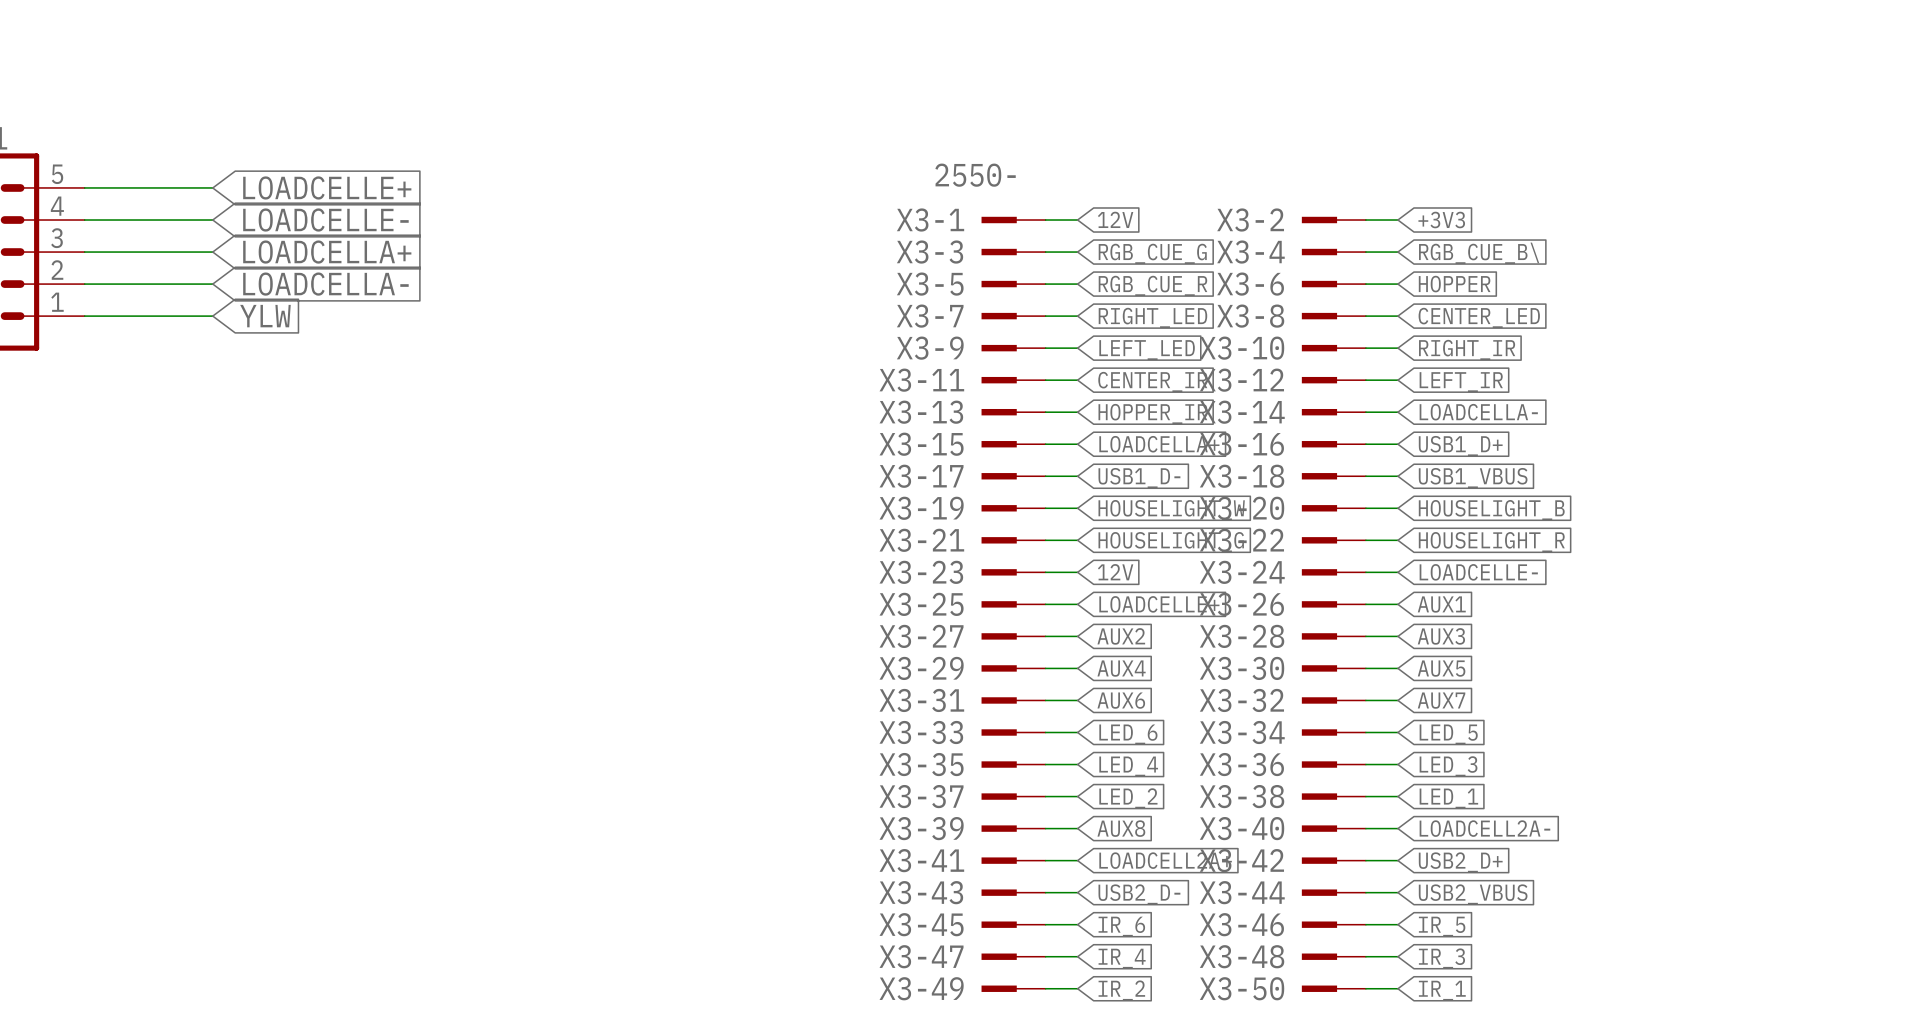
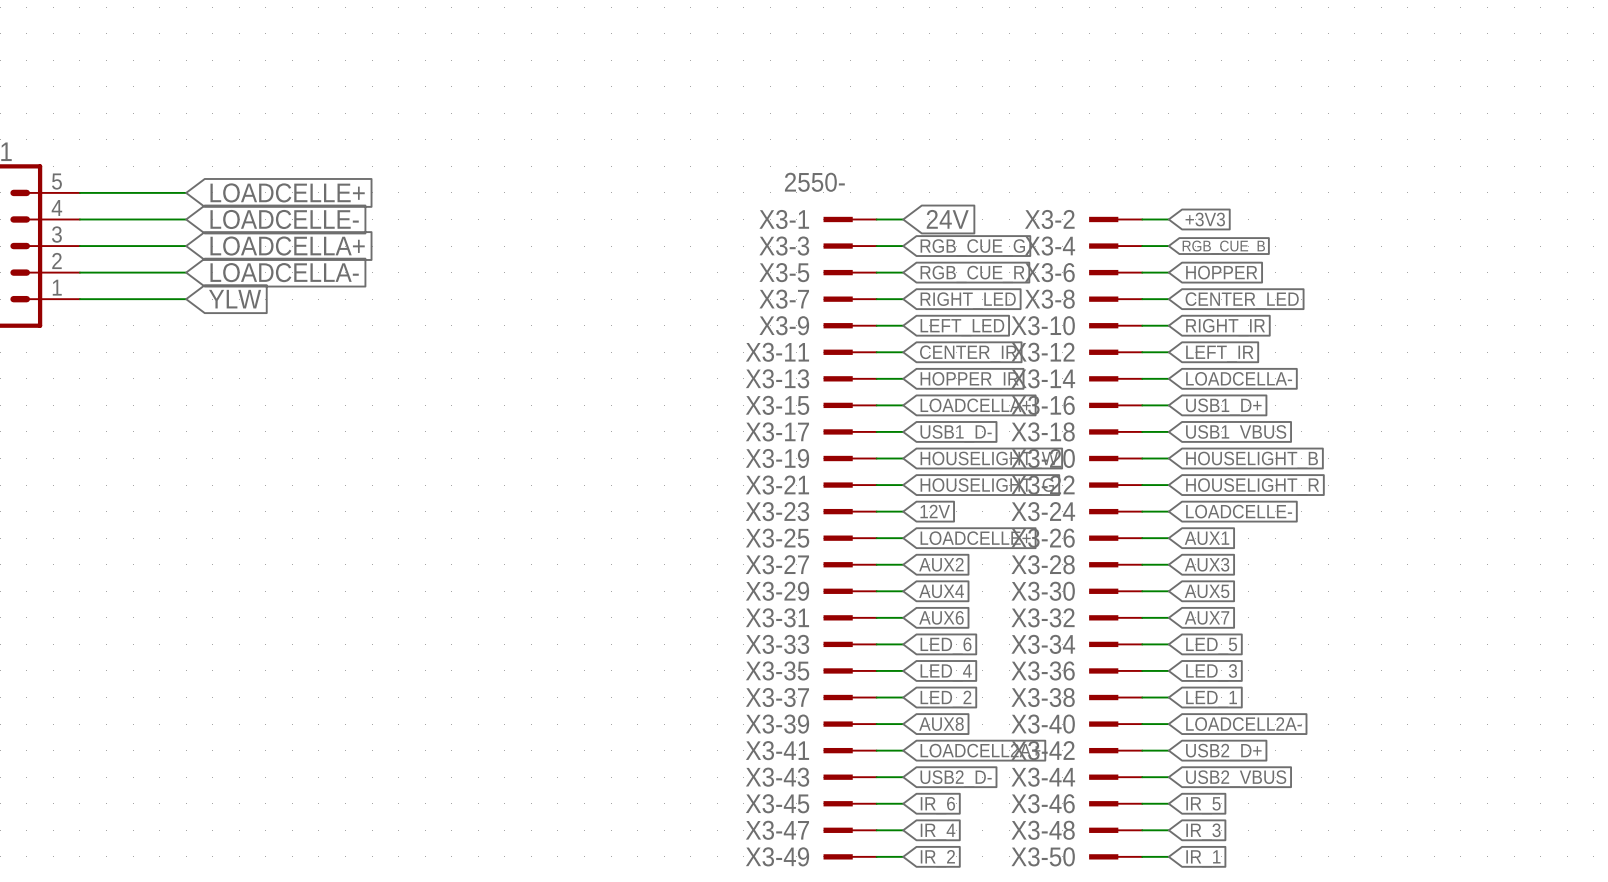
global label: 12V (1115, 219) -> 24V (947, 219)
global label: RGB_CUE_B\ (1479, 253) -> RGB_CUE_B (1223, 247)

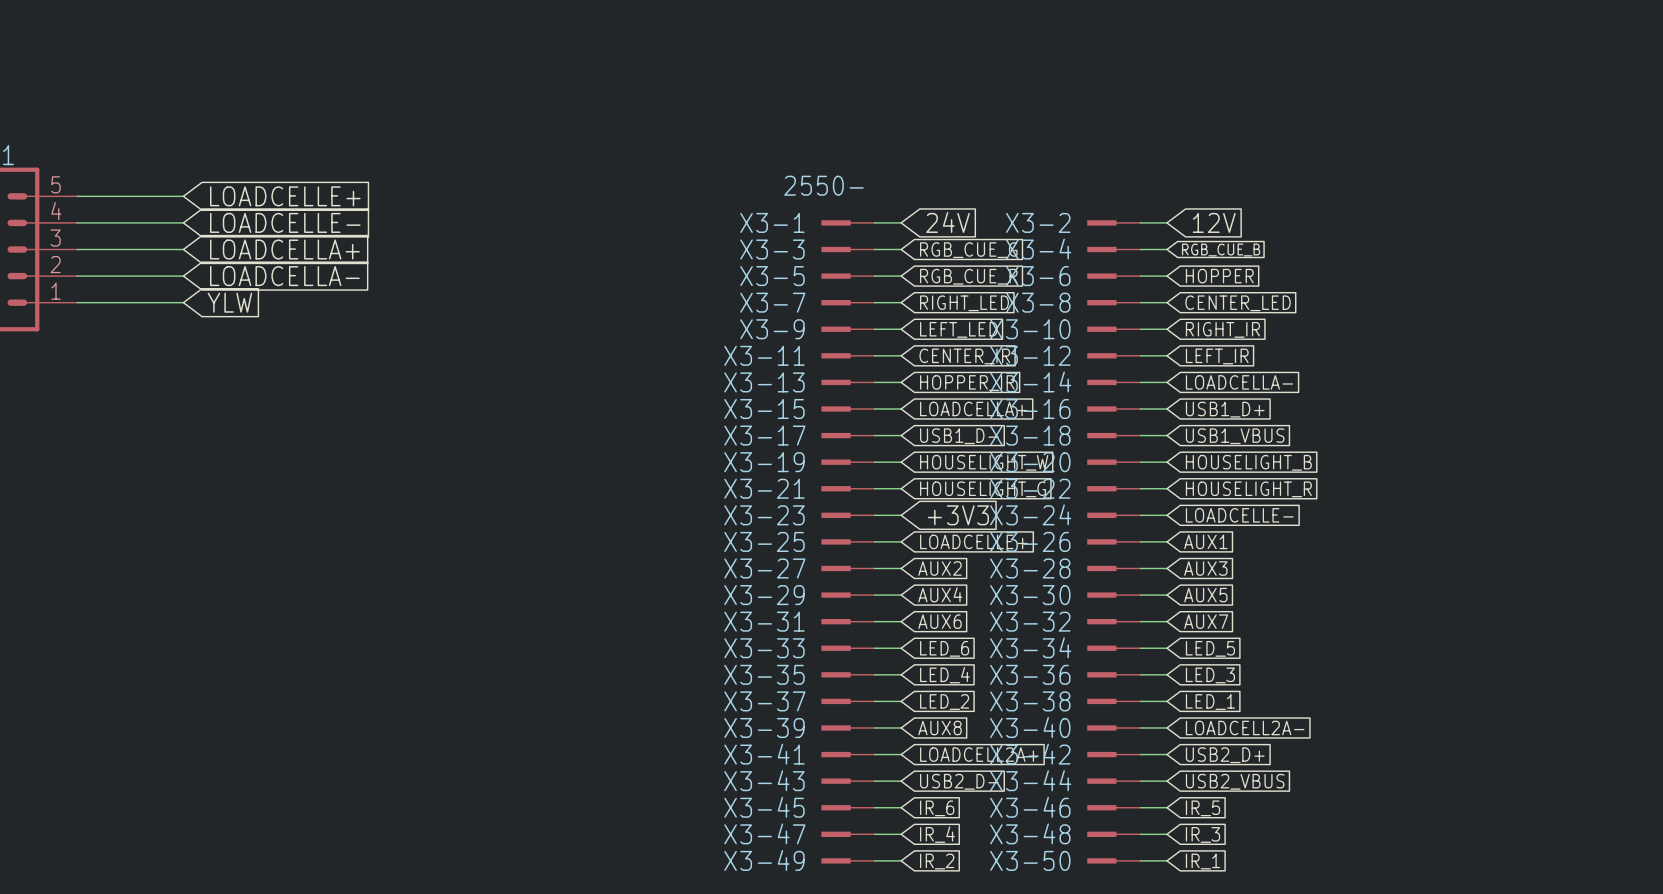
global label: +3V3 (1205, 219) -> 12V (1214, 222)
global label: 12V (935, 511) -> +3V3 (958, 515)

